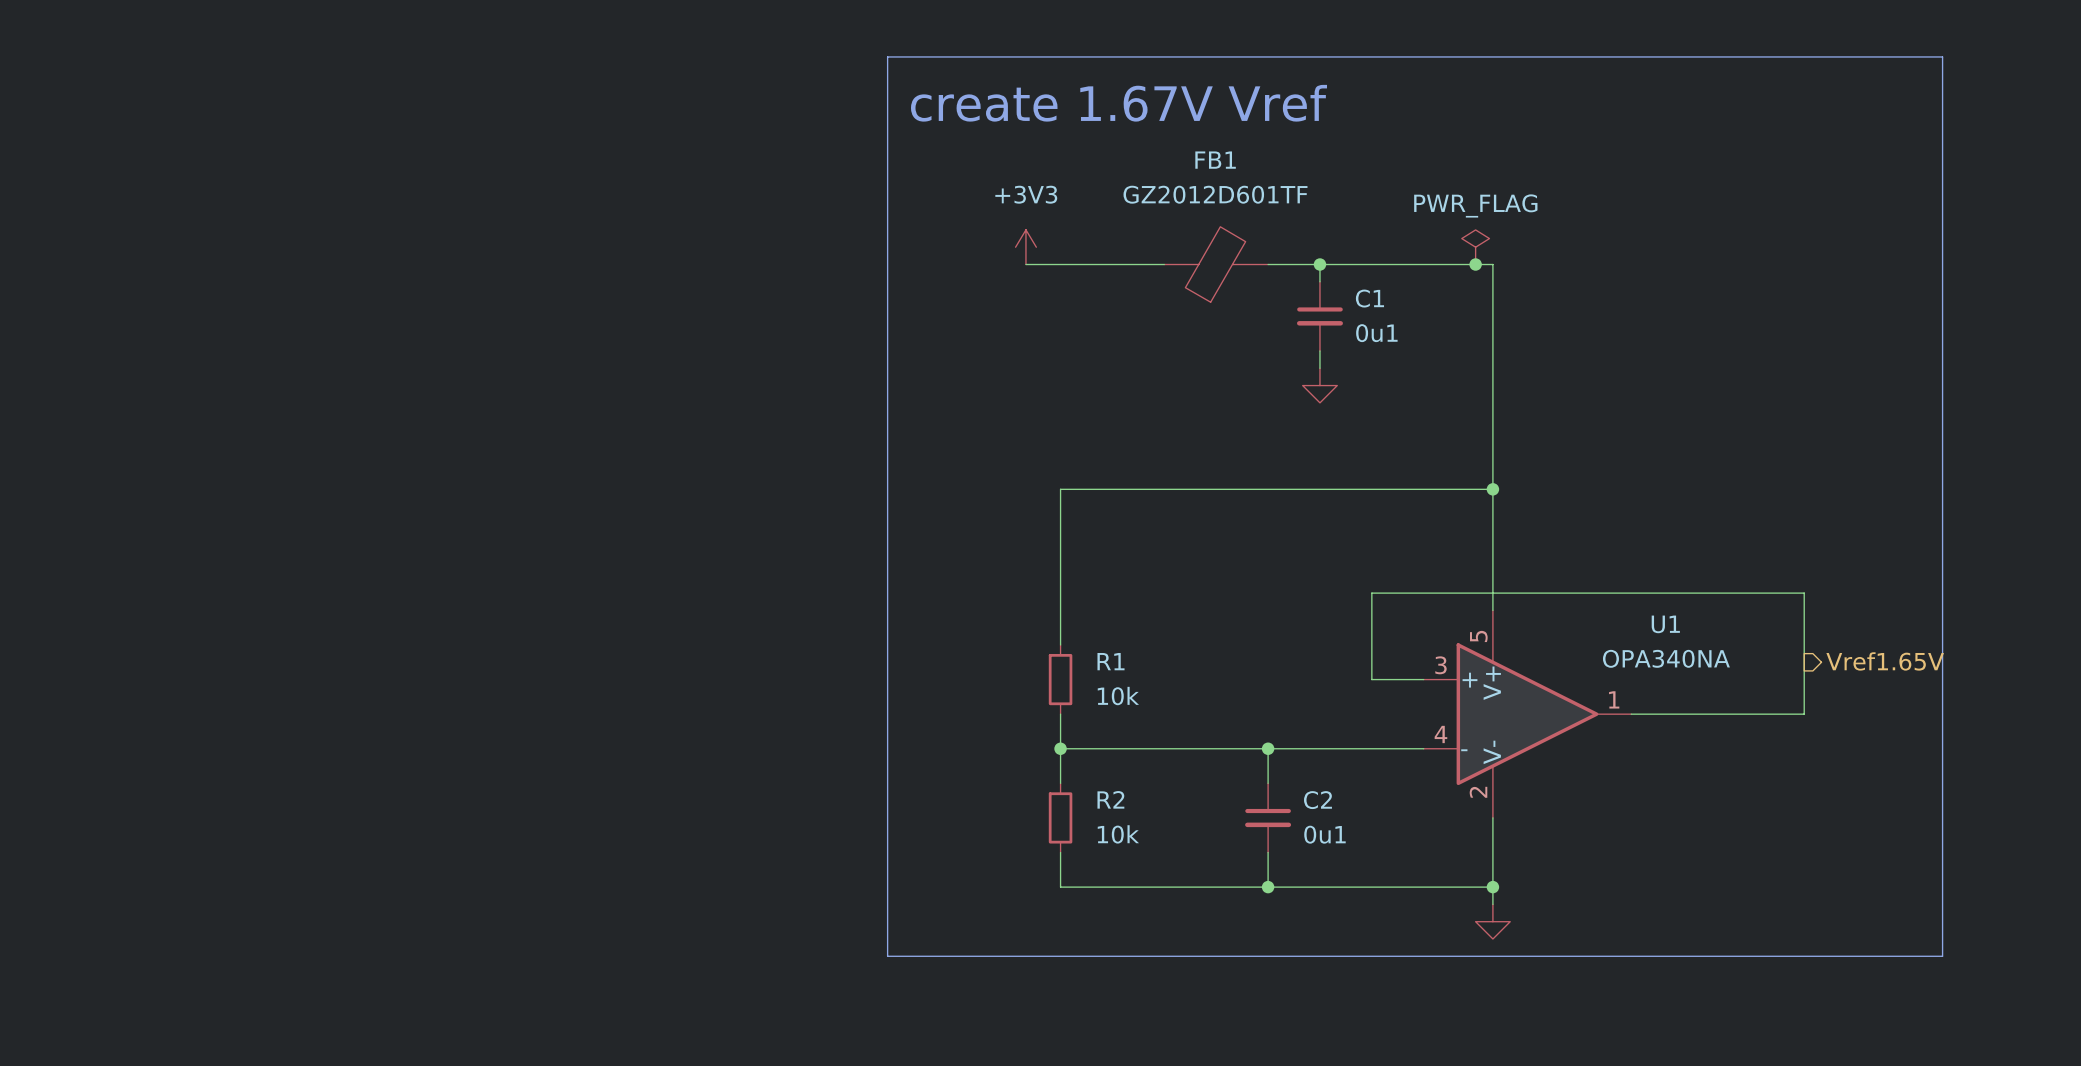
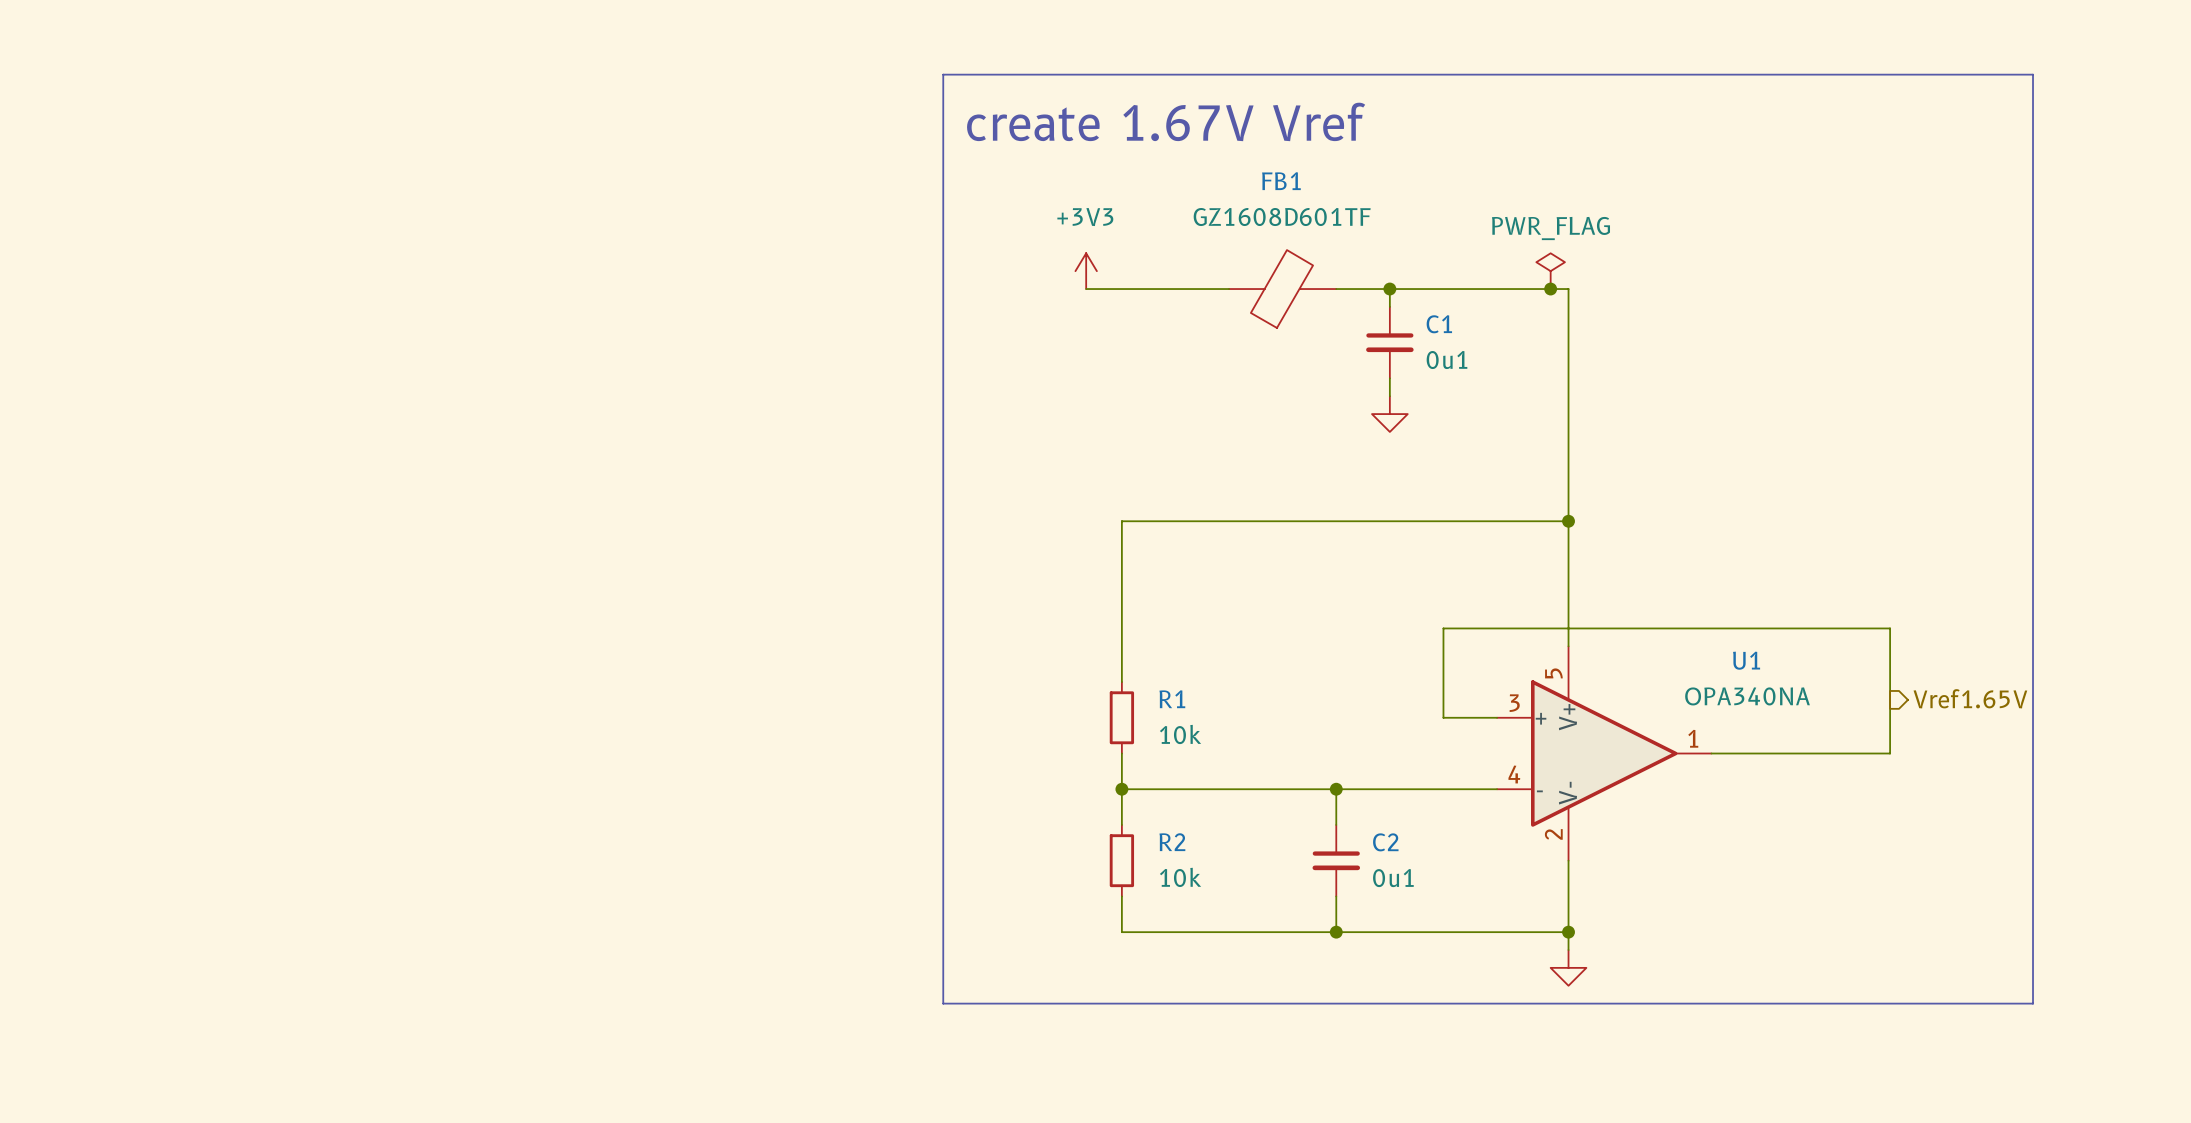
FB1 value: GZ2012D601TF (1215, 194) -> GZ1608D601TF (1282, 216)

